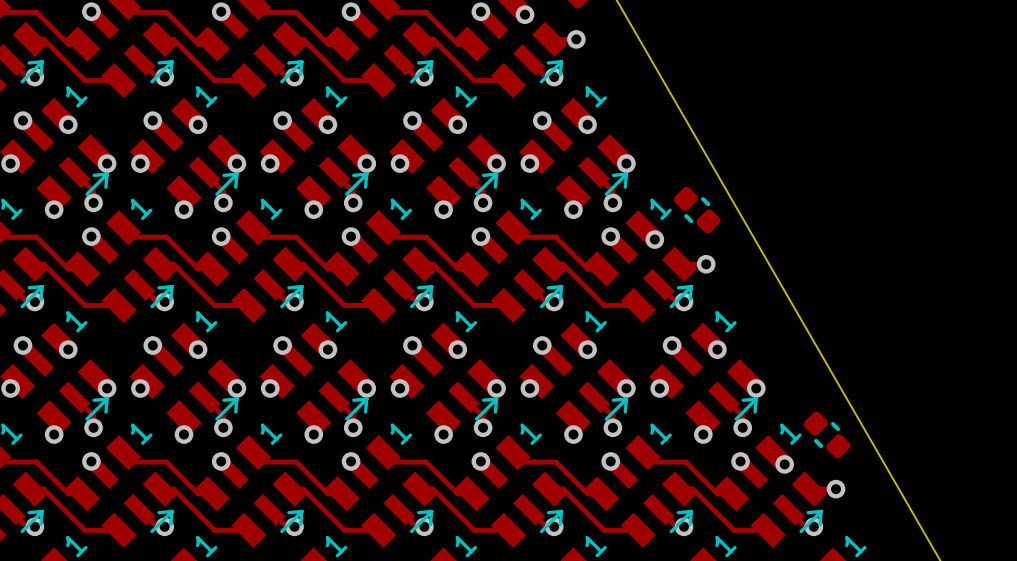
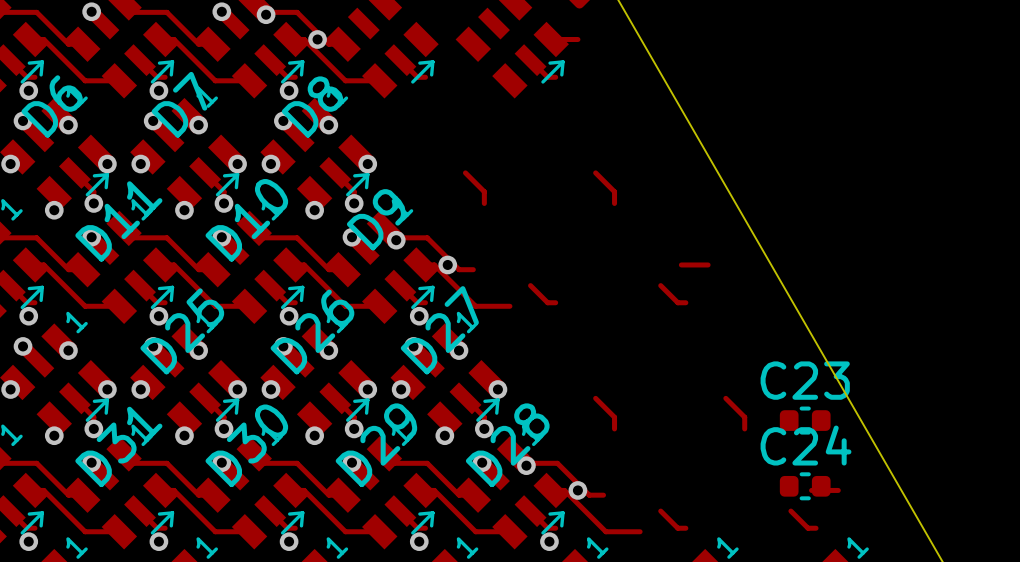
track: (383, 2) (392, 12) (426, 12) (457, 44) (472, 44) -> none
via: (351, 11) -> none
via: (480, 11) -> none
via: none -> (266, 14)
via: (525, 14) -> none
via: none -> (317, 39)
track: (419, 39) (433, 39) (474, 80) (508, 80) -> none
via: (576, 39) -> none
via position: (34, 77) -> (28, 90)
via position: (164, 77) -> (158, 90)
via position: (294, 77) -> (289, 90)
via: (424, 77) -> none
via: (554, 77) -> none
D7 name: none -> D7 (179, 104)
D6 name: none -> D6 (52, 106)
D8 name: none -> D8 (312, 107)
via: (412, 120) -> none
via: (542, 120) -> none
via: (457, 124) -> none
via: (587, 124) -> none
part: (445, 154) -> none
part: (575, 154) -> none
via: (400, 163) -> none
via: (496, 163) -> none
via: (529, 163) -> none
via: (626, 163) -> none
via: (483, 202) -> none
via: (612, 202) -> none
via: (443, 209) -> none
via: (573, 209) -> none
part: (697, 210) -> none
D10 name: none -> D10 (246, 220)
D9 name: none -> D9 (376, 219)
D11 name: none -> D11 (118, 221)
track: (513, 227) (522, 237) (555, 237) (587, 268) (601, 268) -> none
via: (480, 236) -> none
via: (610, 236) -> none
via: none -> (396, 240)
via: (654, 239) -> none
via: none -> (447, 264)
track: (549, 264) (563, 264) (604, 305) (638, 305) -> none
via: (706, 264) -> none
part: (510, 266) -> none
part: (640, 266) -> none
via position: (34, 301) -> (28, 316)
via position: (164, 301) -> (158, 316)
via position: (294, 301) -> (289, 316)
via position: (424, 301) -> (419, 316)
via: (554, 301) -> none
via: (684, 301) -> none
D27 name: none -> D27 (439, 330)
D25 name: none -> D25 (182, 331)
D26 name: none -> D26 (312, 331)
via: (542, 345) -> none
via: (672, 345) -> none
via: (587, 349) -> none
via: (717, 349) -> none
part: (575, 379) -> none
part: (705, 379) -> none
via: (529, 388) -> none
via: (626, 388) -> none
via: (659, 388) -> none
via: (756, 388) -> none
C23: none -> (805, 420)
via: (612, 427) -> none
via: (742, 427) -> none
via: (573, 434) -> none
via: (703, 434) -> none
part: (827, 435) -> none
D30 name: none -> D30 (246, 445)
D29 name: none -> D29 (376, 445)
D28 name: none -> D28 (507, 445)
D31 name: none -> D31 (118, 446)
track: (643, 452) (652, 462) (685, 462) (717, 493) (731, 493) -> none
via: (610, 461) -> none
via: (740, 461) -> none
via: none -> (526, 465)
via: (784, 464) -> none
C24: none -> (805, 486)
via: none -> (577, 490)
track: (679, 489) (692, 489) (734, 530) (768, 530) -> none
via: (836, 489) -> none
part: (640, 491) -> none
part: (770, 491) -> none
via position: (34, 526) -> (28, 541)
via position: (164, 526) -> (158, 541)
via position: (294, 526) -> (289, 541)
via position: (424, 526) -> (419, 541)
via position: (554, 526) -> (549, 541)
via: (684, 526) -> none
via: (813, 526) -> none

